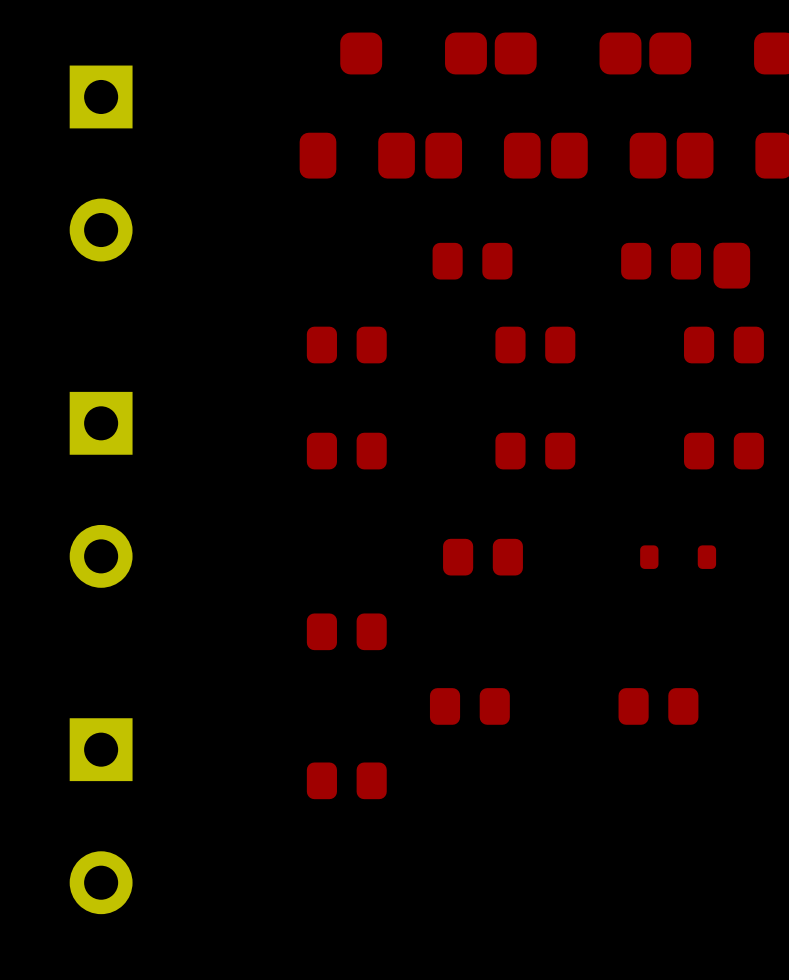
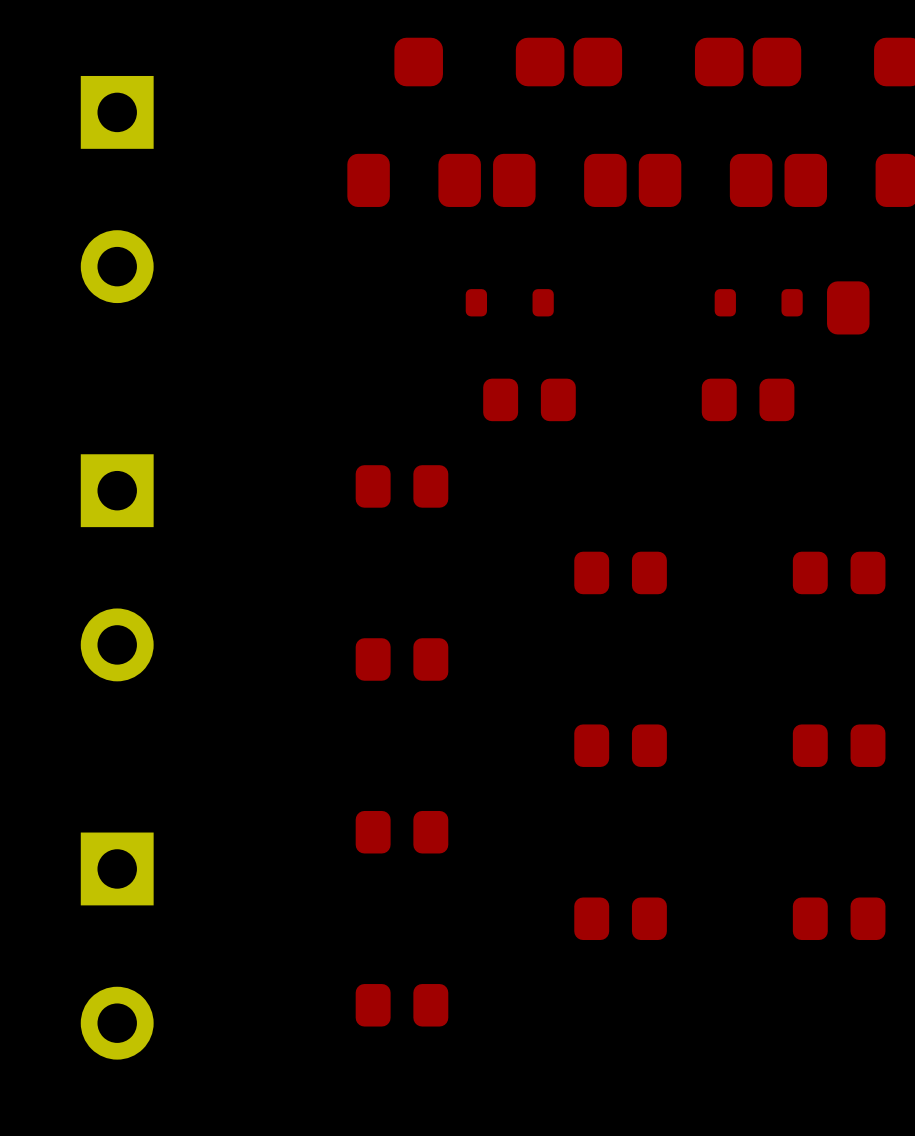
part footprint: [621, 242, 702, 280] -> [714, 289, 803, 317]
part: (472, 261) -> none
part: (346, 345) -> none
part: none -> (529, 399)
part: (535, 345) -> none
part: none -> (748, 399)
part: (723, 345) -> none
part position: (346, 451) -> (401, 486)
part: (535, 451) -> none
part position: (723, 451) -> (839, 572)
part: none -> (620, 572)
part: (482, 557) -> none
part position: (678, 557) -> (509, 302)
part: none -> (401, 659)
part: (346, 631) -> none
part: none -> (620, 745)
part: none -> (839, 745)
part: (469, 706) -> none
part: (658, 706) -> none
part: none -> (401, 832)
part: (346, 780) -> none
part: none -> (620, 918)
part: none -> (839, 918)
part: none -> (401, 1005)

